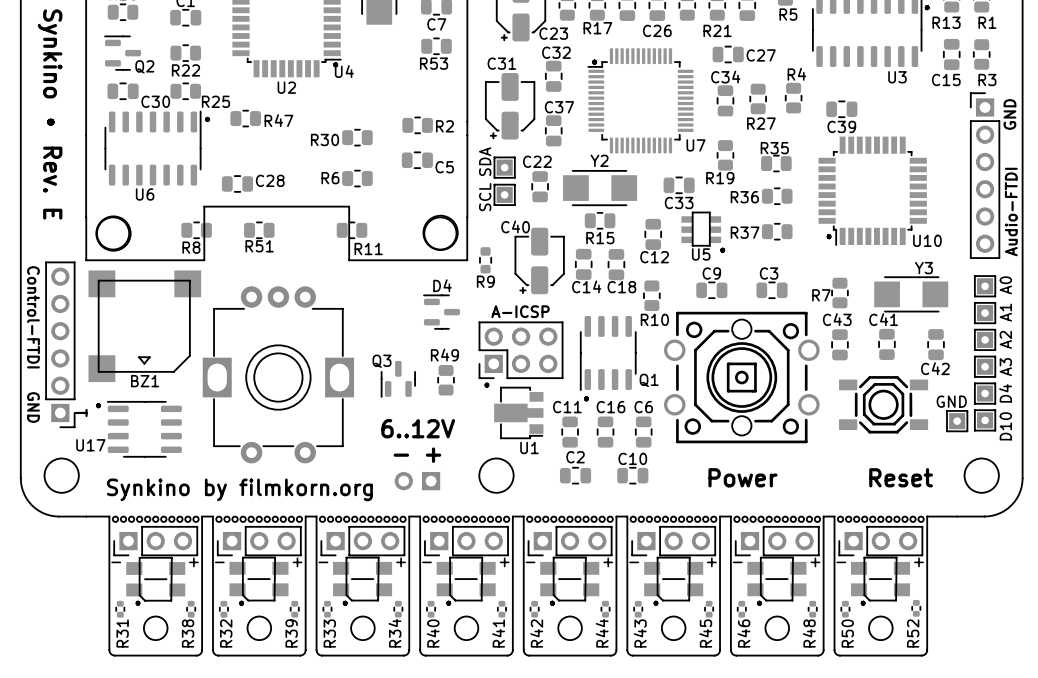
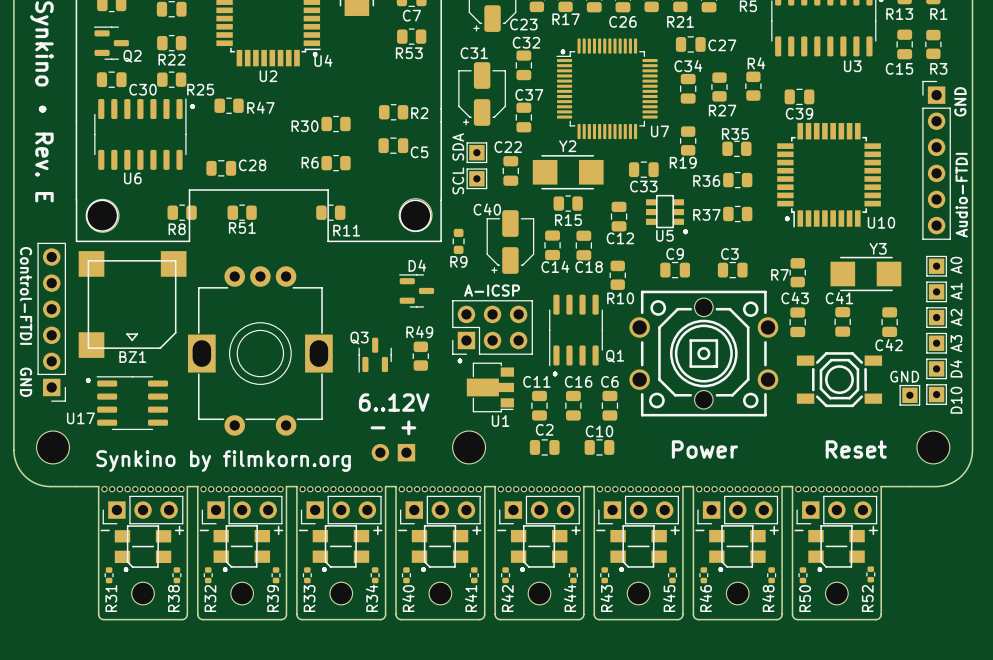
text: T (81, 412) -> none

